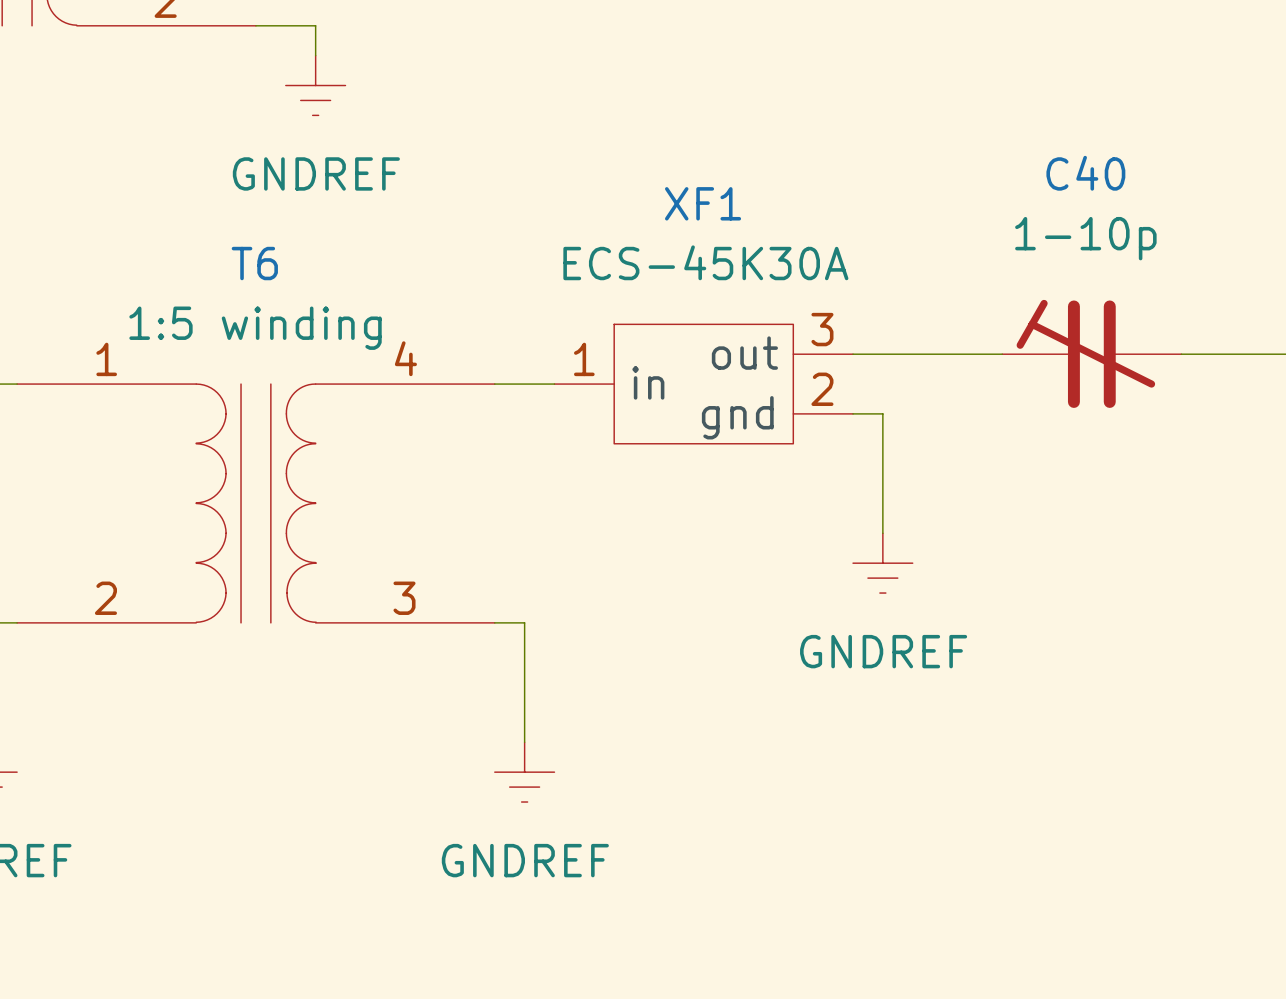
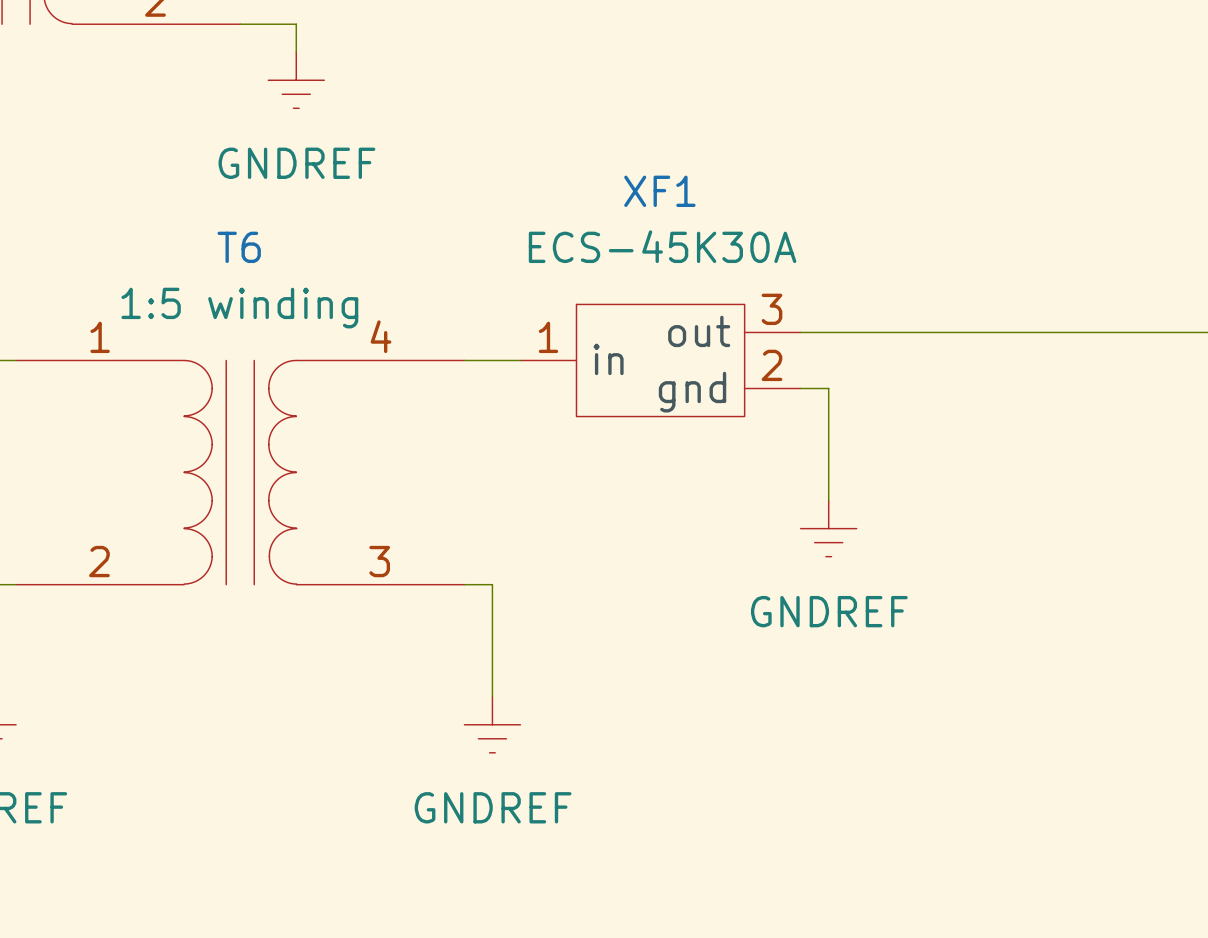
C40: 1-10p (1091, 353) -> none

